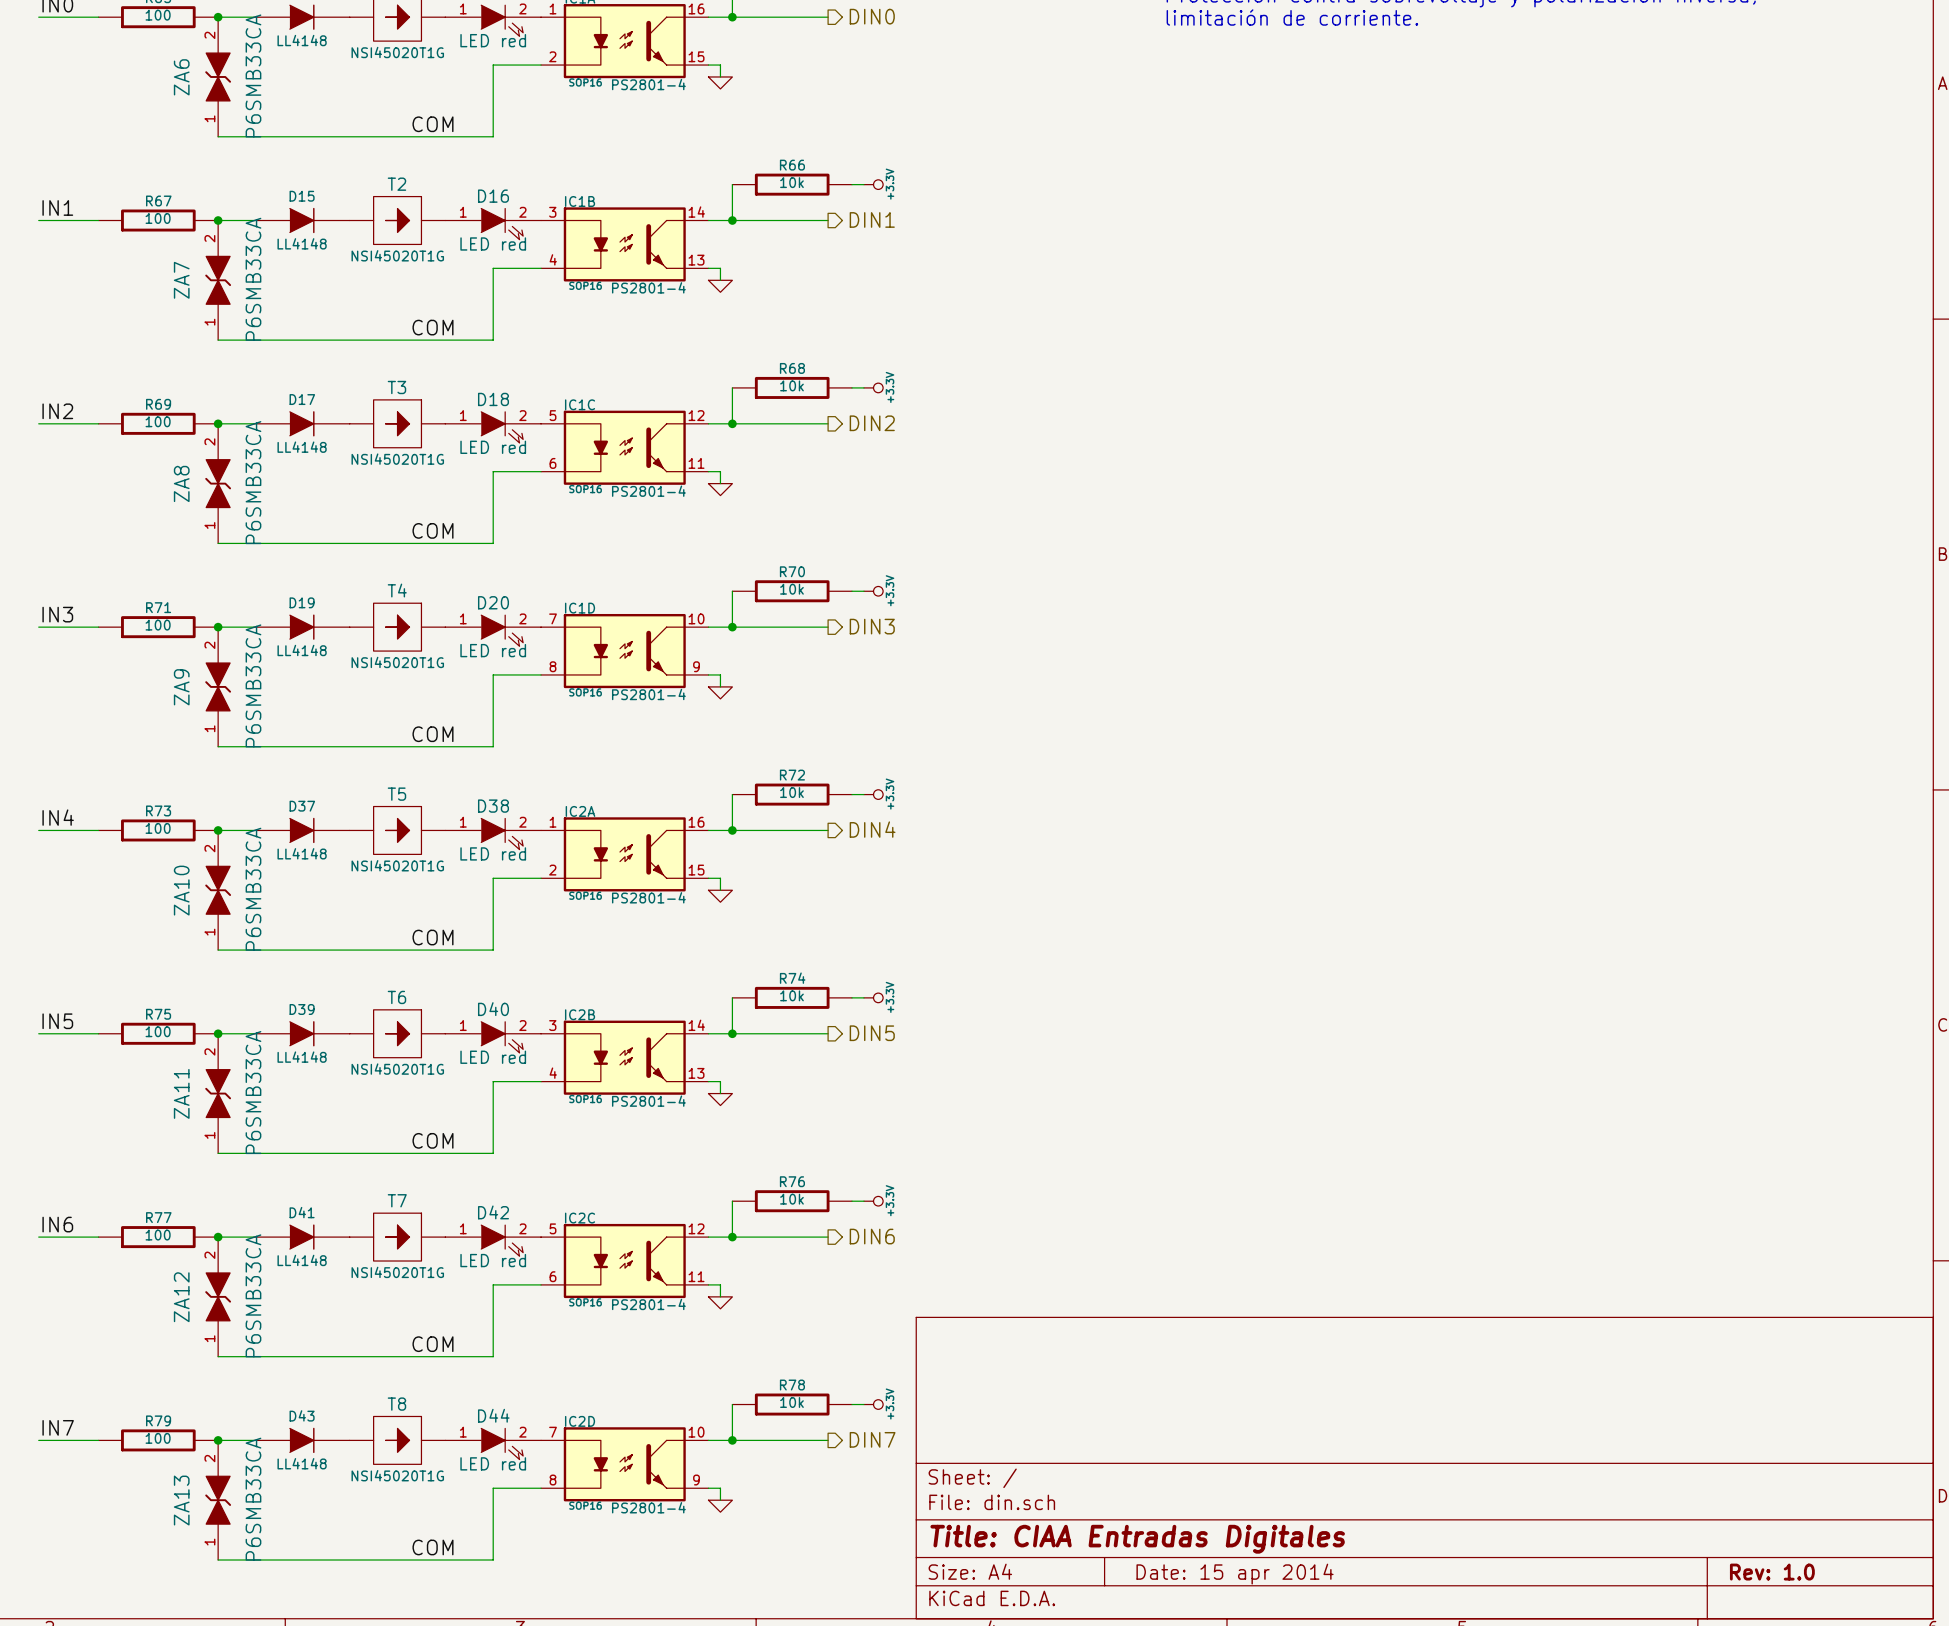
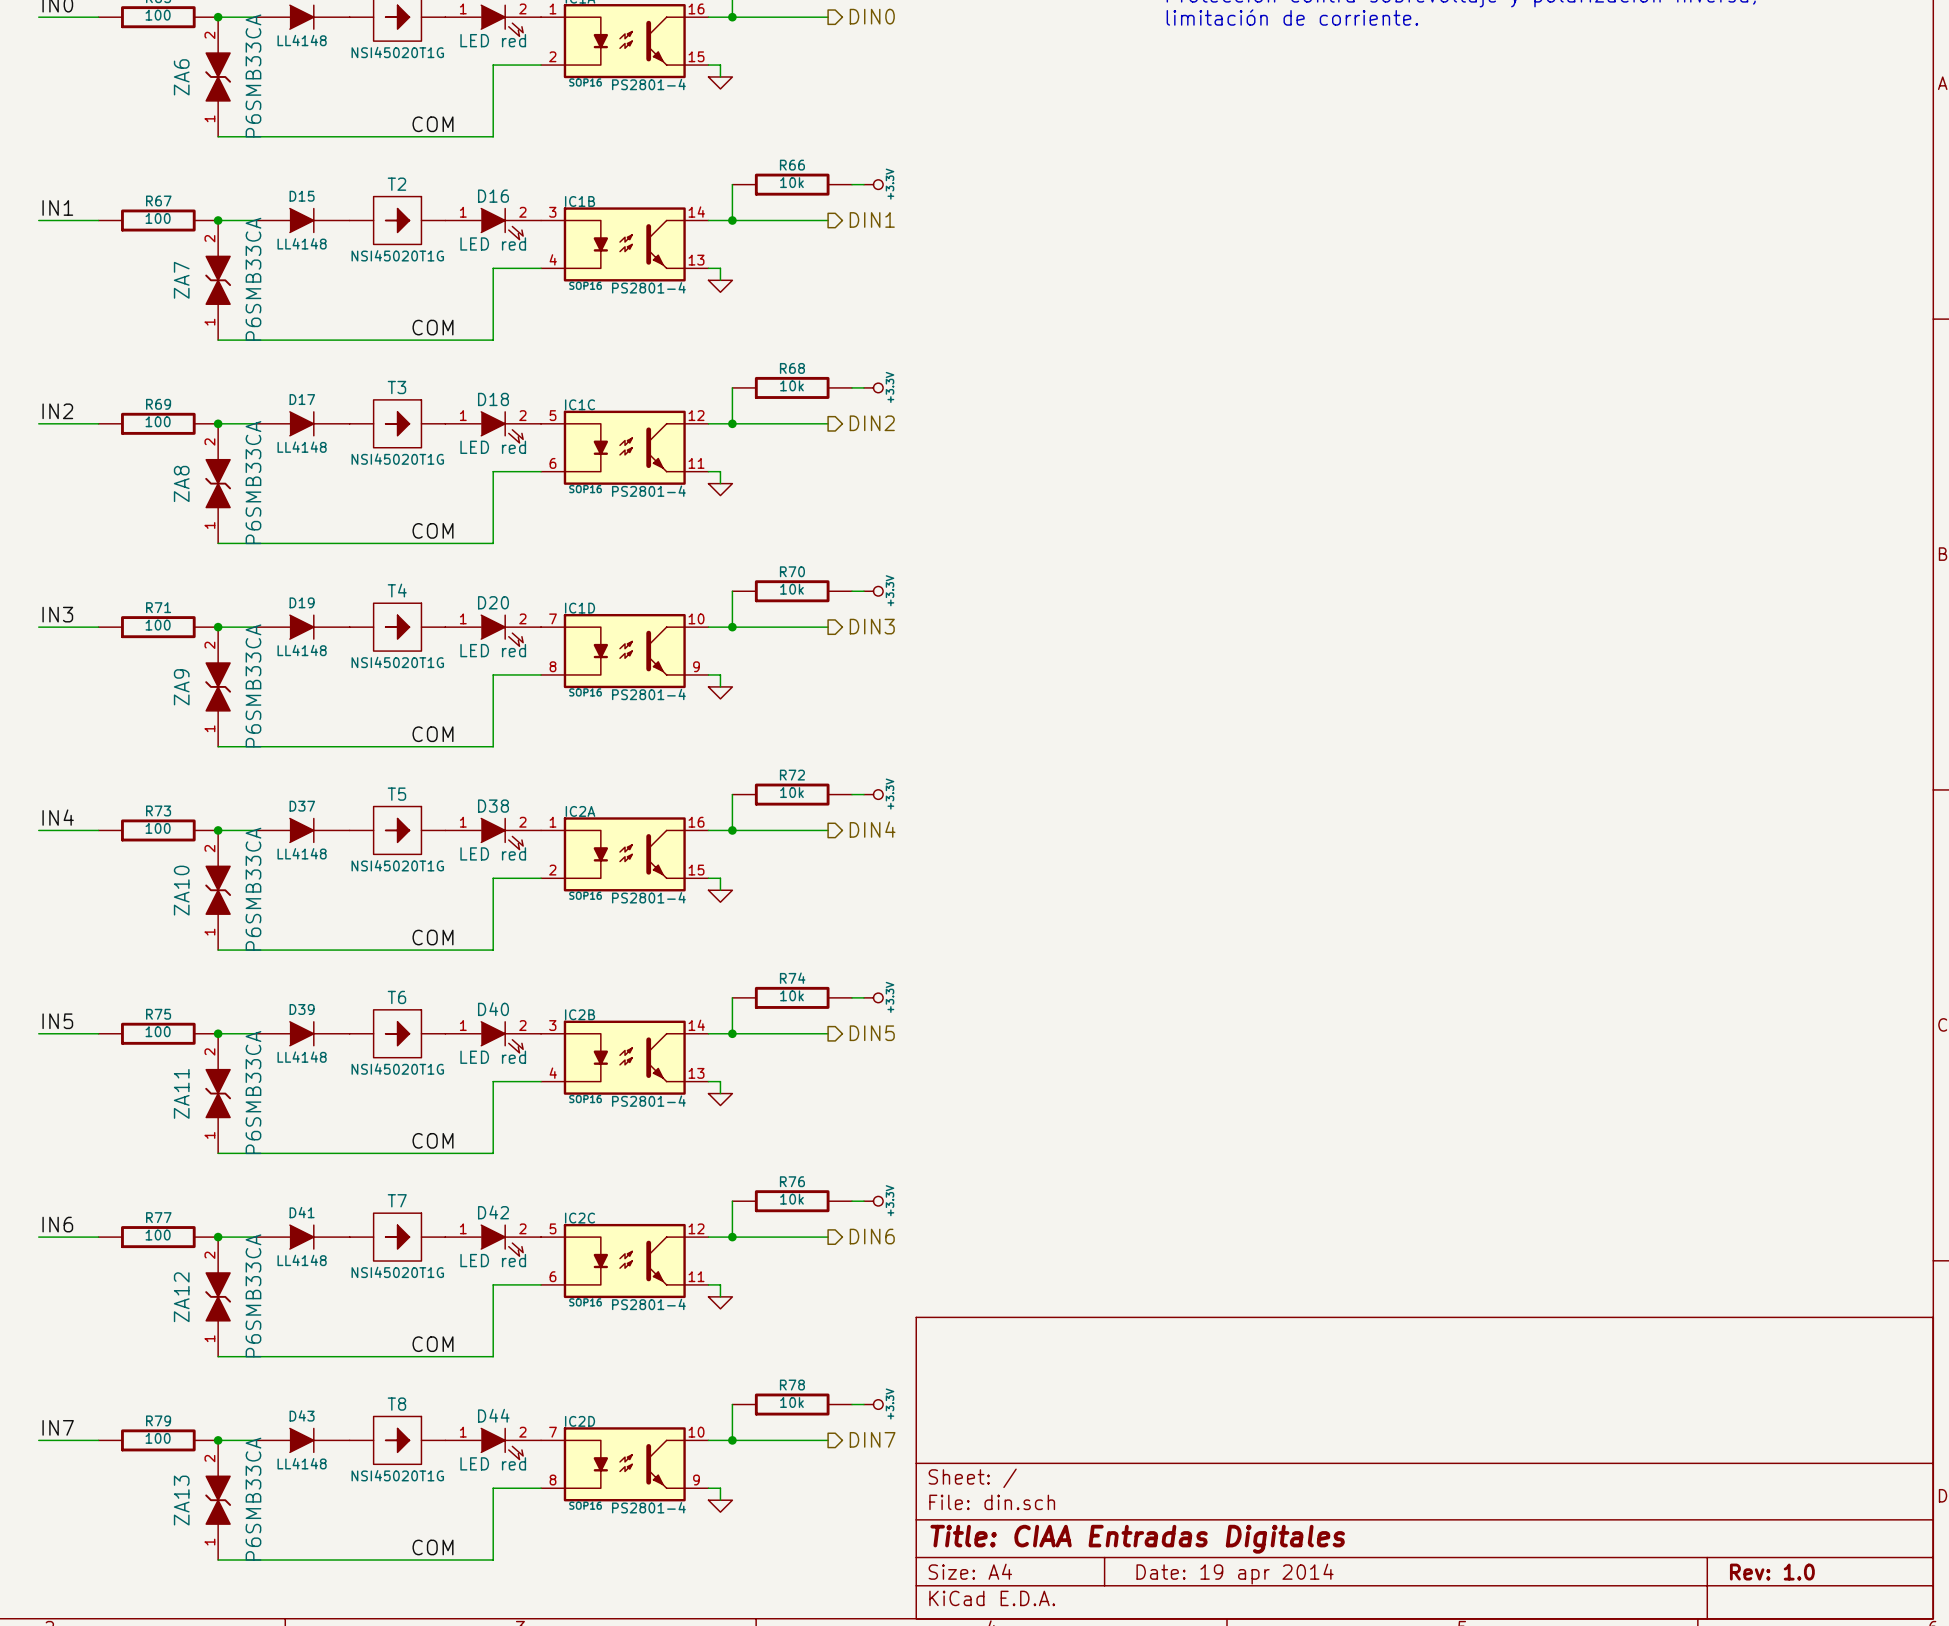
title block: Date: 15 apr 2014 (1235, 1574) -> Date: 19 apr 2014 (1235, 1574)

